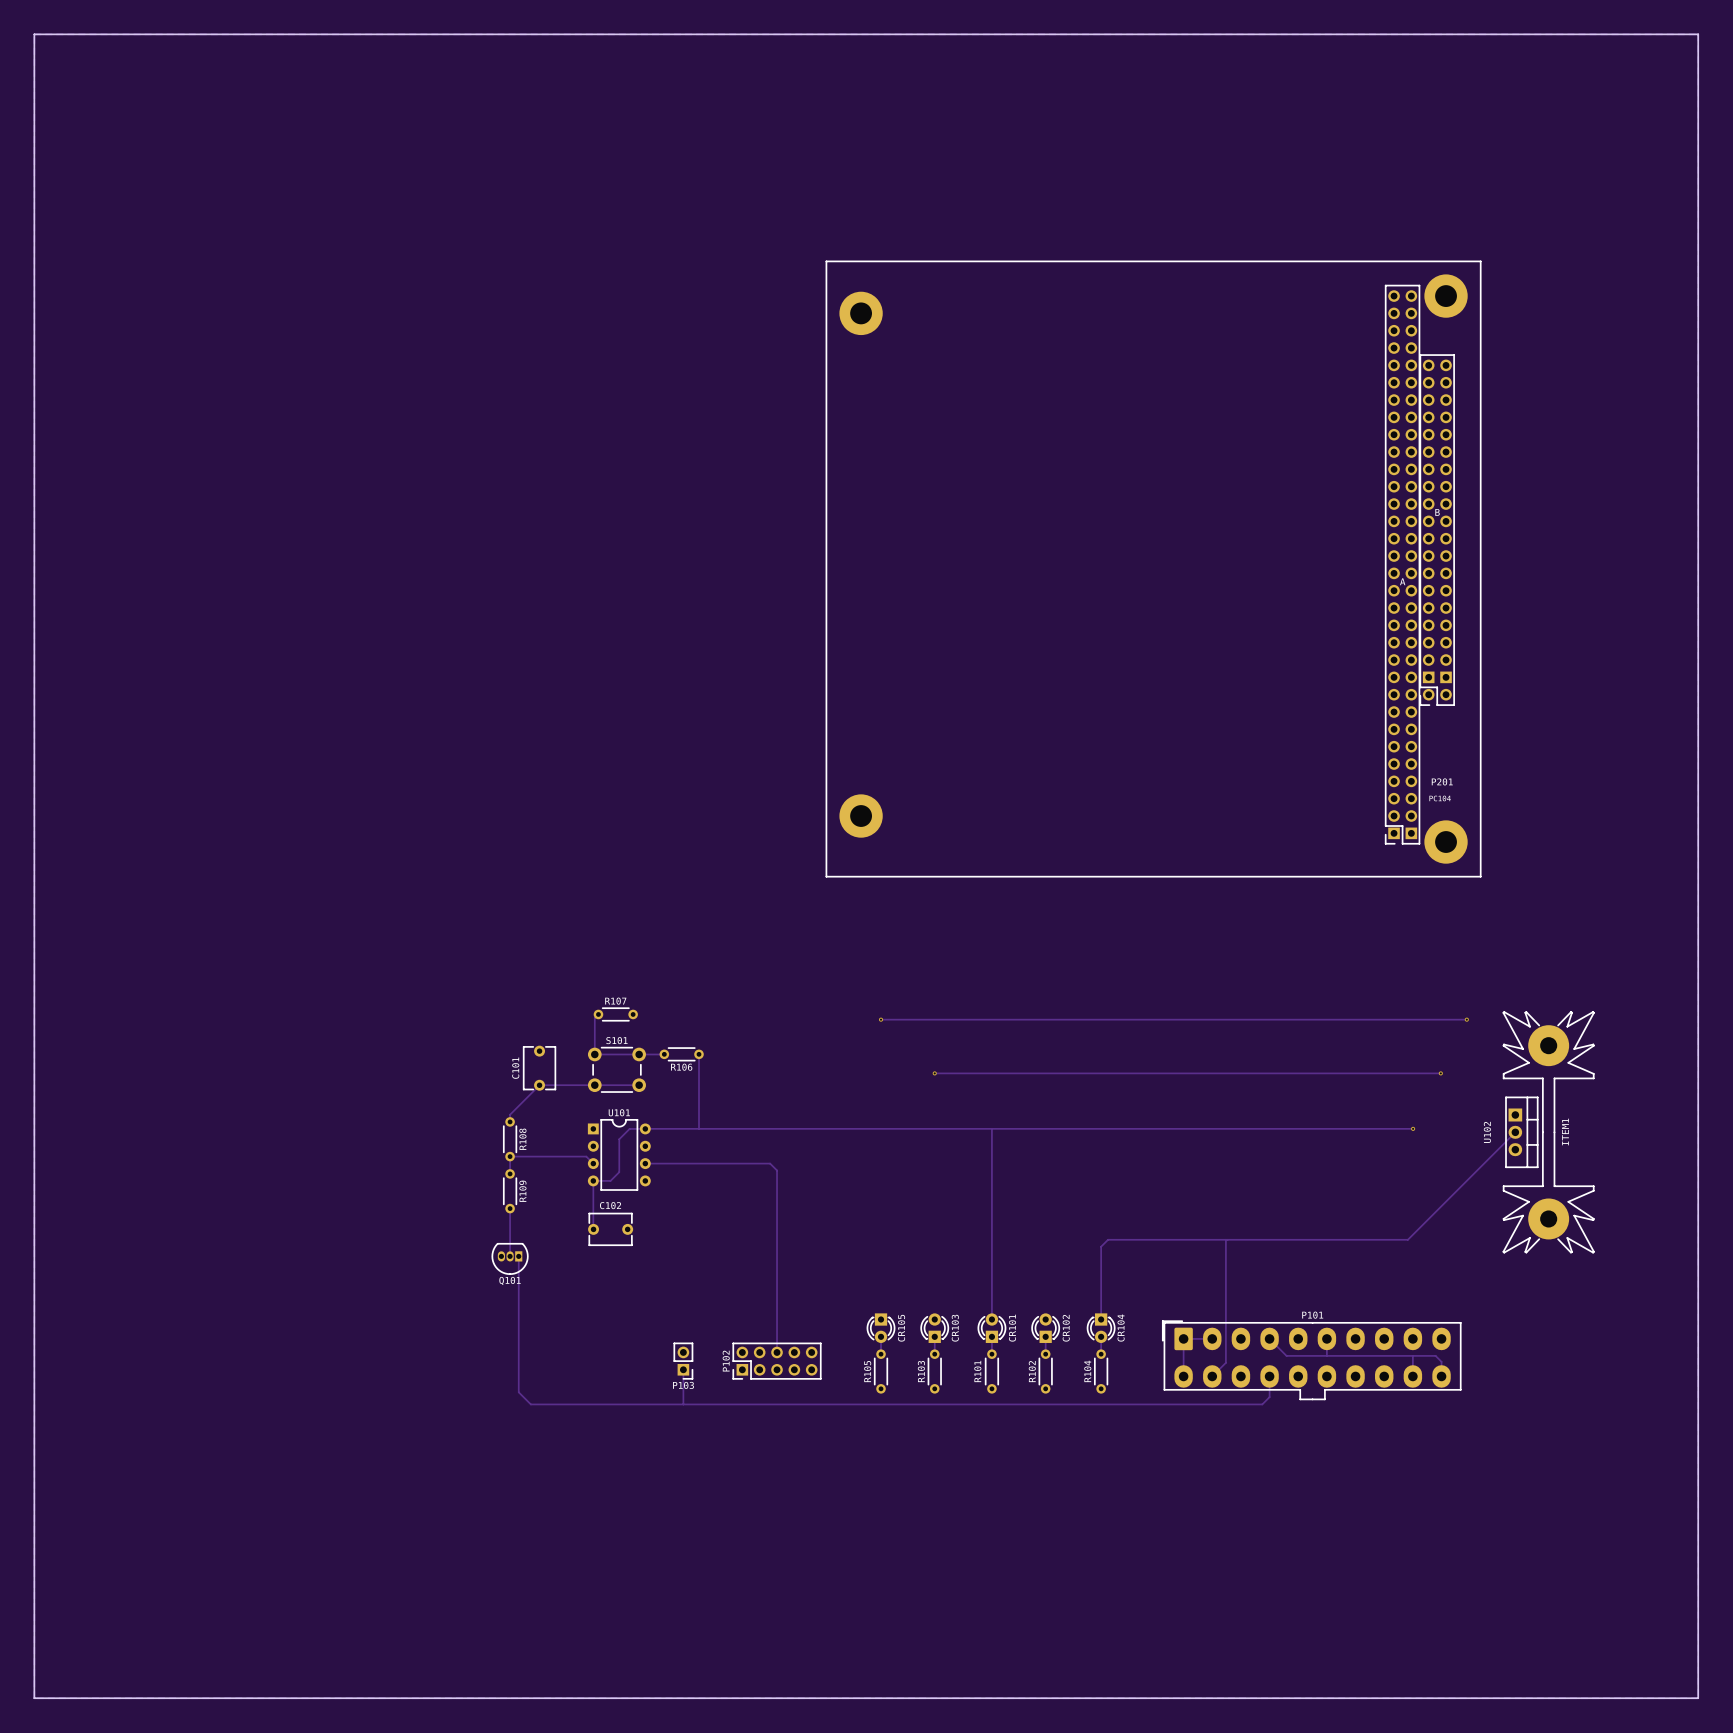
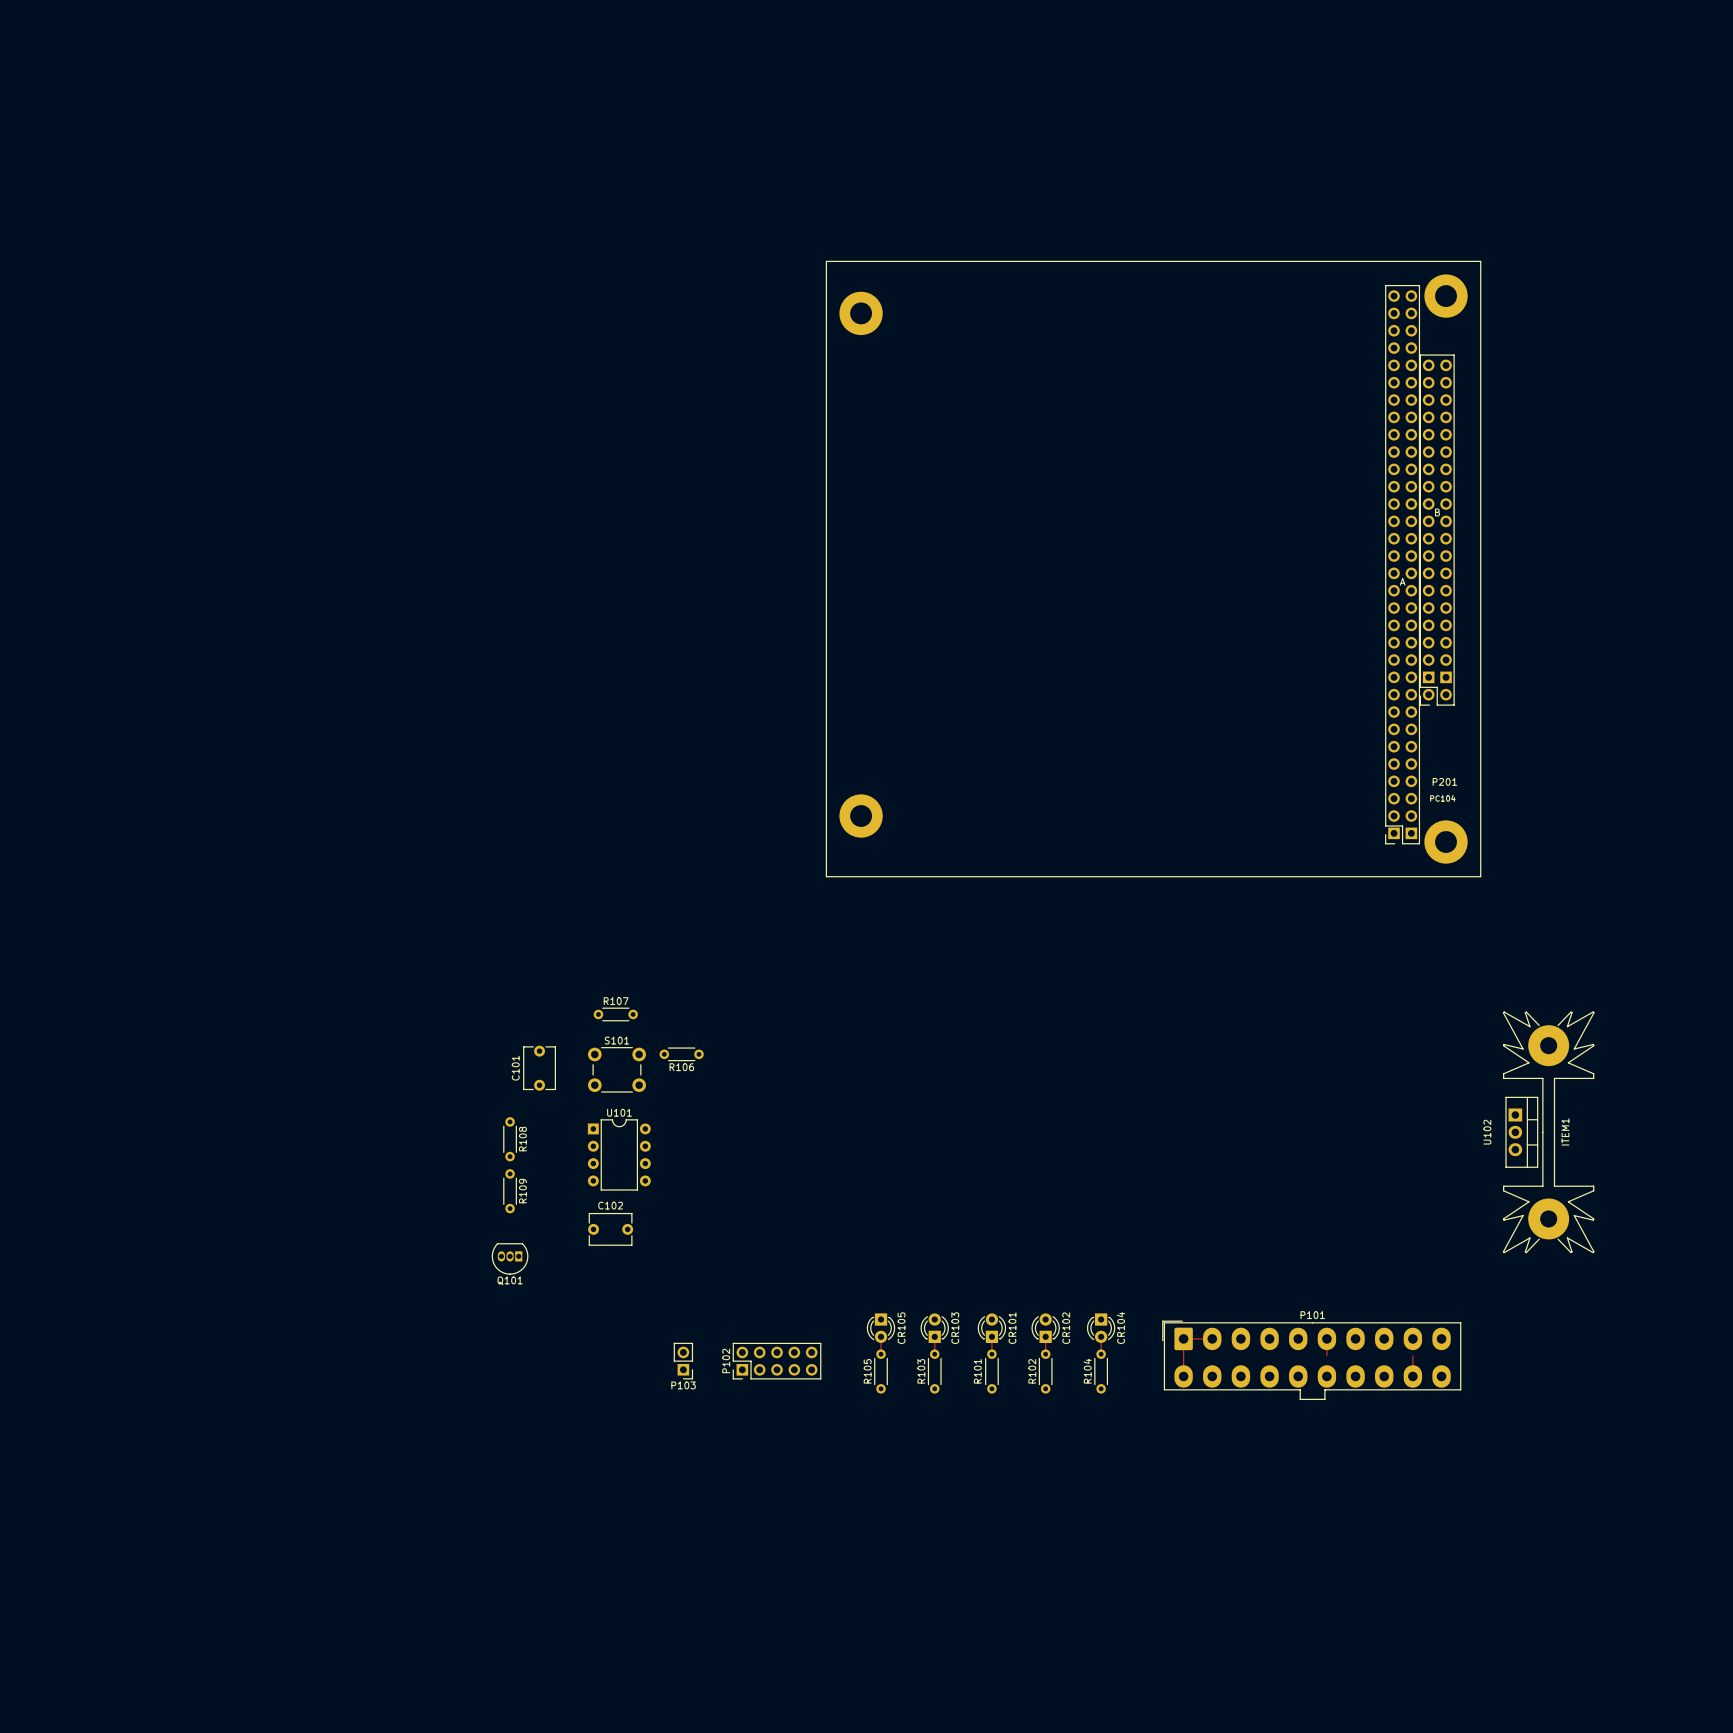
board edge: (34, 34) (1698, 34) (1698, 1698) (34, 1698) (34, 34) -> none
track: (598, 1014) (594, 1018) (594, 1054) (664, 1054) -> none
track: (881, 1019) (1466, 1019) -> none
via: (881, 1019) -> none
via: (1466, 1019) -> none
track: (698, 1054) (698, 1128) -> none
track: (934, 1073) (1440, 1073) -> none
via: (934, 1073) -> none
via: (1440, 1073) -> none
track: (639, 1085) (539, 1085) (510, 1114) (510, 1121) -> none
track: (645, 1128) (1413, 1128) -> none
track: (645, 1128) (629, 1128) (619, 1139) (619, 1172) (610, 1180) (593, 1180) (593, 1229) -> none
track: (991, 1128) (991, 1319) -> none
via: (1413, 1128) -> none
track: (1515, 1132) (1407, 1239) (1108, 1239) (1101, 1246) (1101, 1319) -> none
track: (593, 1163) (586, 1156) (510, 1156) (510, 1173) -> none
track: (645, 1163) (770, 1163) (777, 1170) (777, 1352) -> none
track: (510, 1208) (510, 1256) -> none
track: (1225, 1239) (1225, 1362) (1212, 1376) -> none
track: (518, 1256) (518, 1392) (530, 1404) (1262, 1404) (1269, 1397) (1269, 1376) -> none
track: (1269, 1338) (1286, 1355) (1435, 1355) (1441, 1361) (1441, 1376) -> none
track: (683, 1369) (683, 1404) -> none

